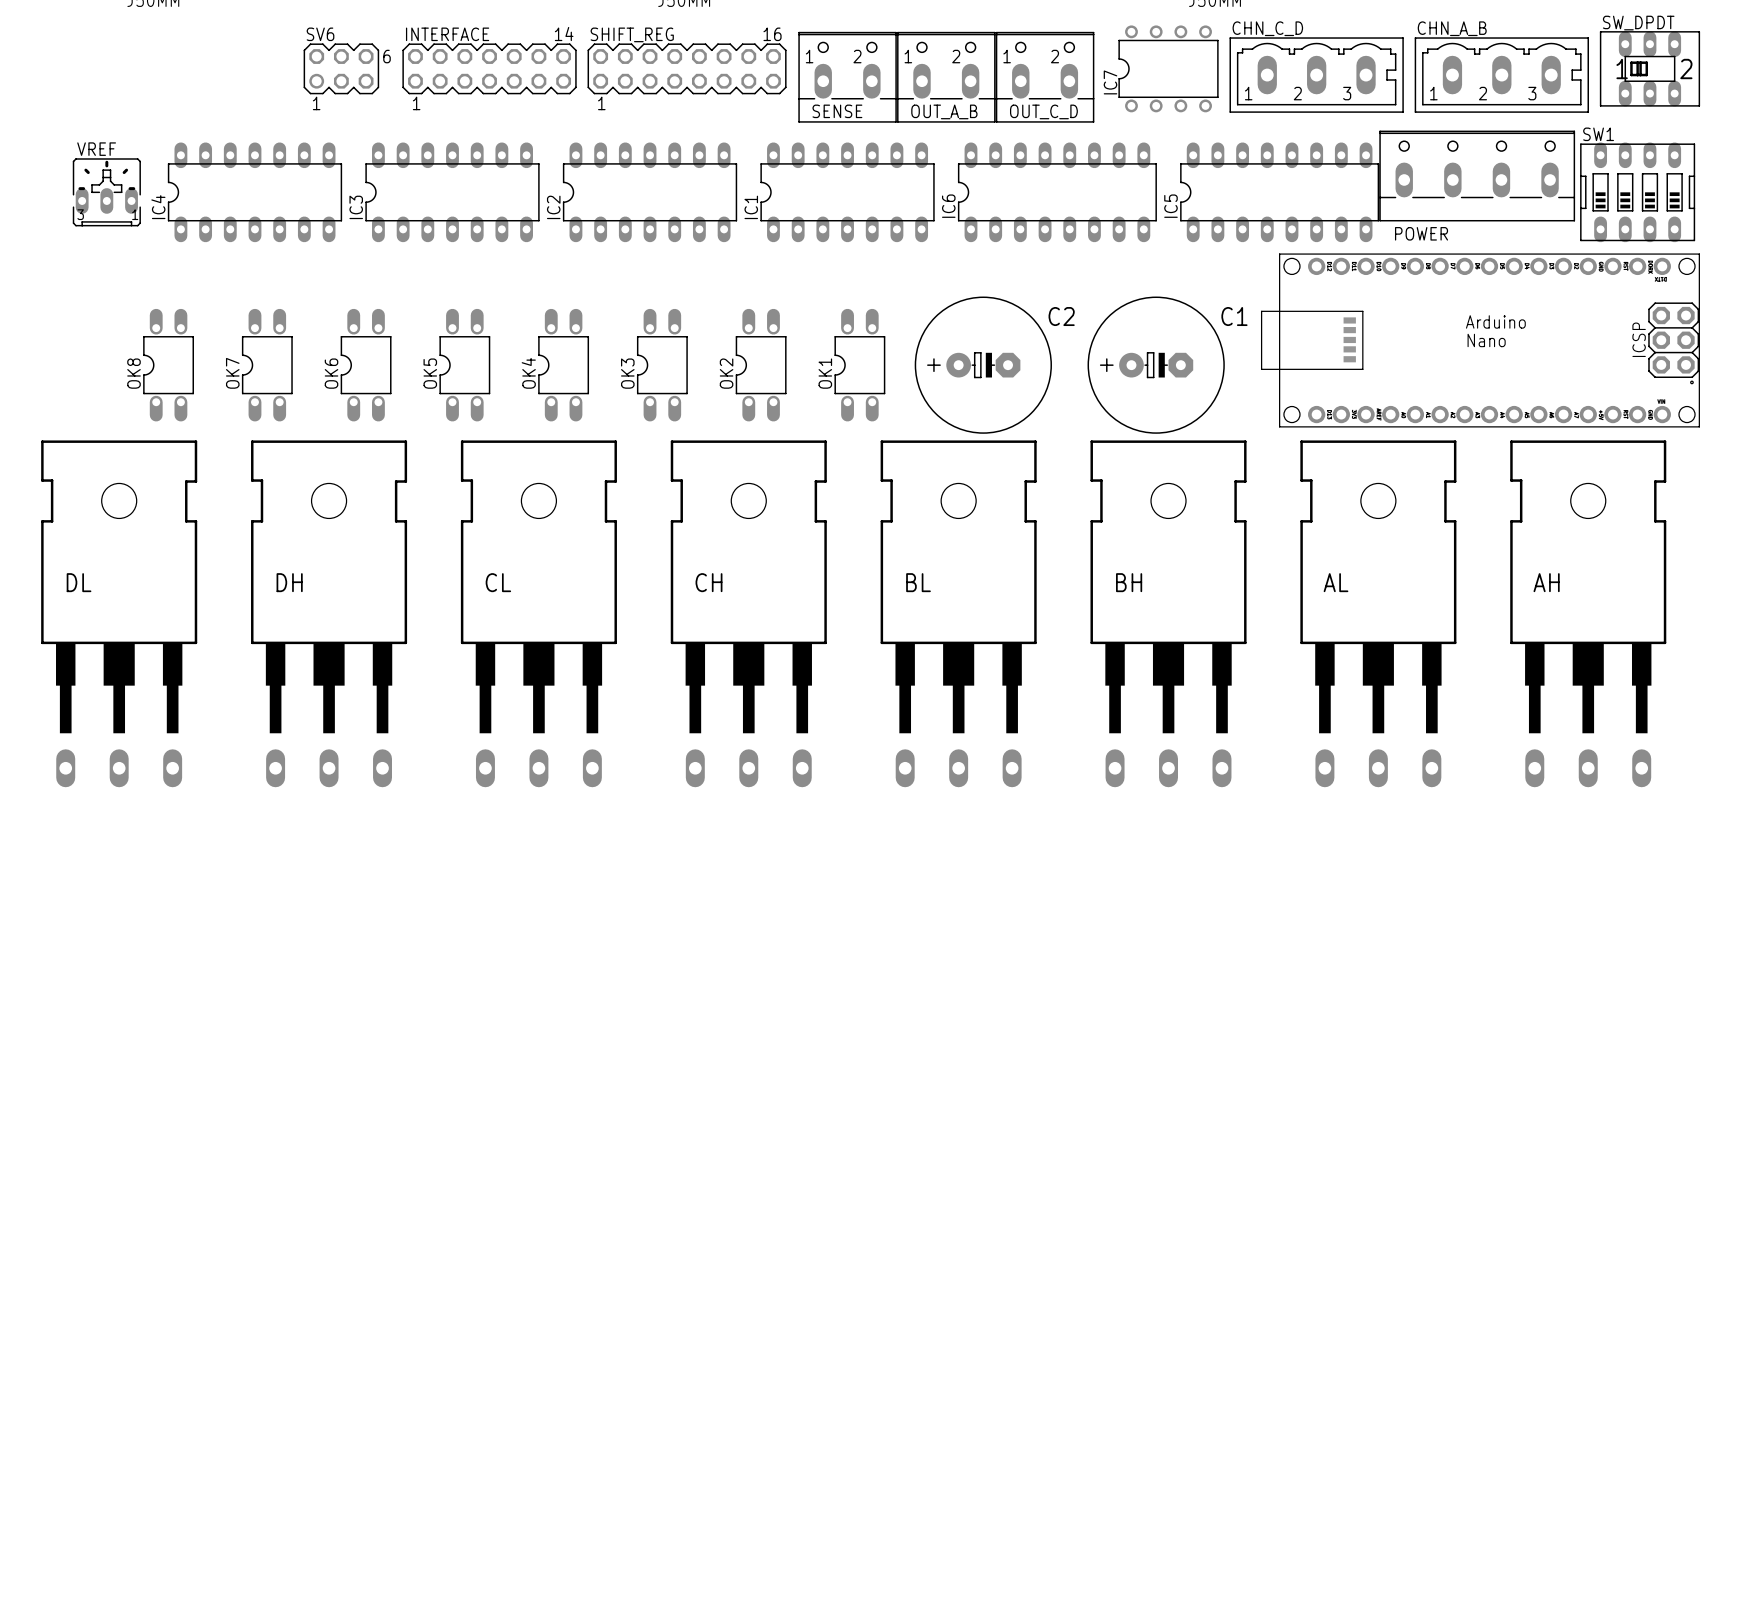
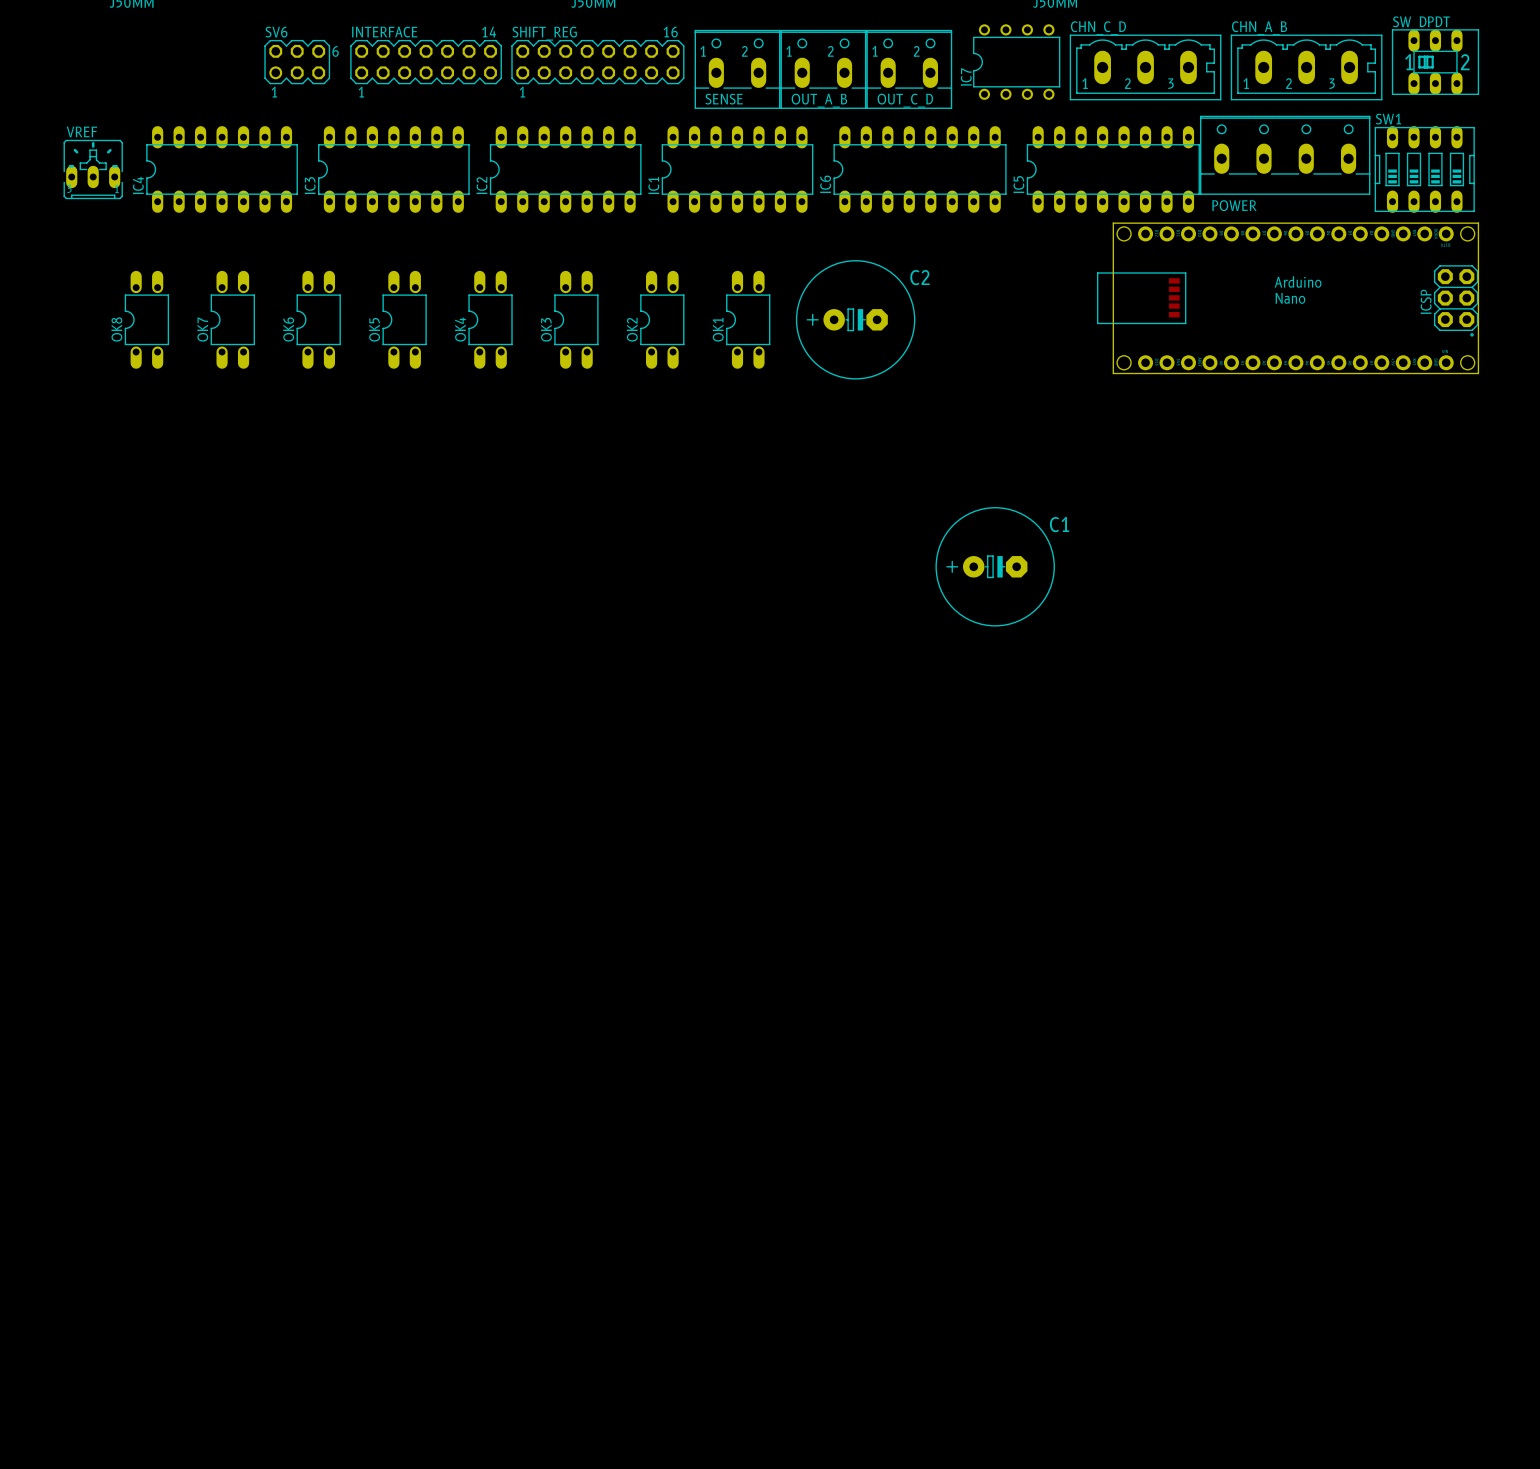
C1 position: (1156, 365) -> (995, 566)
DL: (119, 613) -> none
DH: (329, 613) -> none
CL: (538, 613) -> none
CH: (748, 613) -> none
BL: (958, 613) -> none
BH: (1168, 613) -> none
AL: (1378, 613) -> none
AH: (1588, 613) -> none

